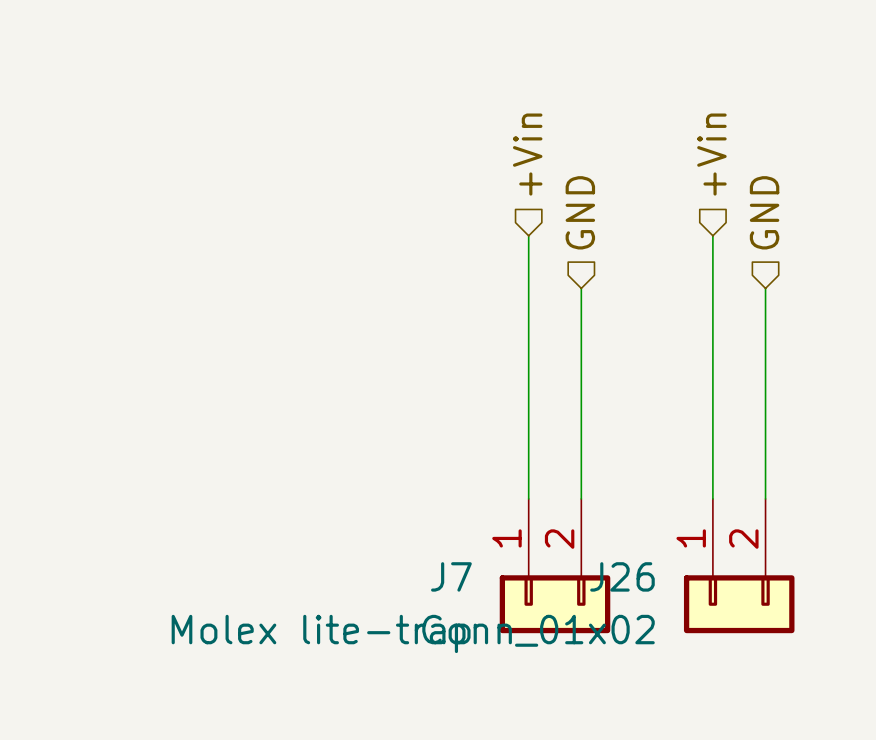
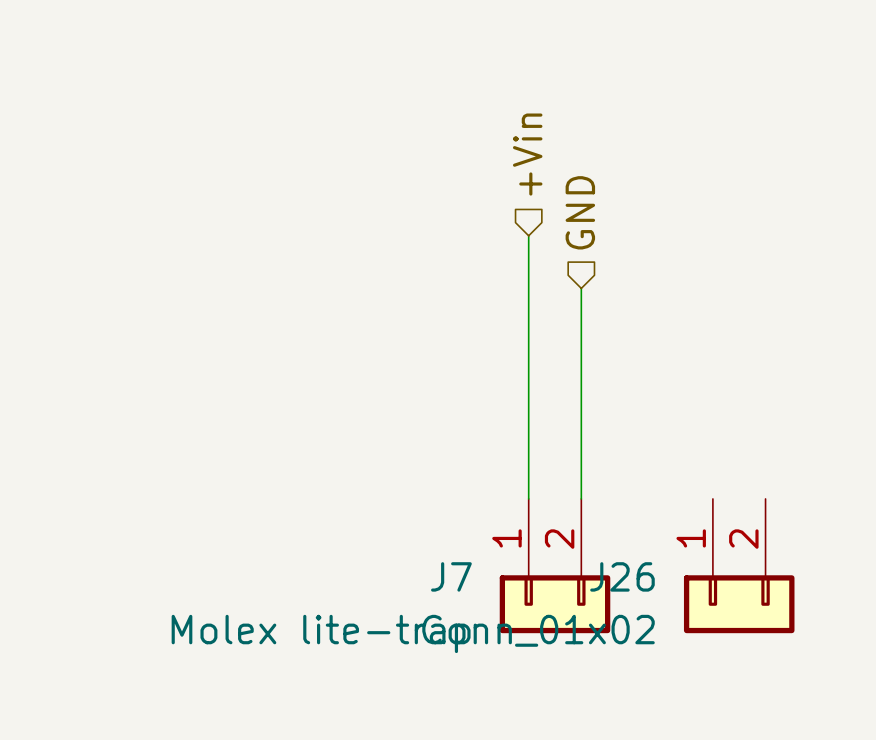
hierarchical label: +Vin (711, 154) -> none
hierarchical label: GND (764, 212) -> none
wire: (712, 235) (712, 498) -> none
wire: (765, 288) (765, 498) -> none

